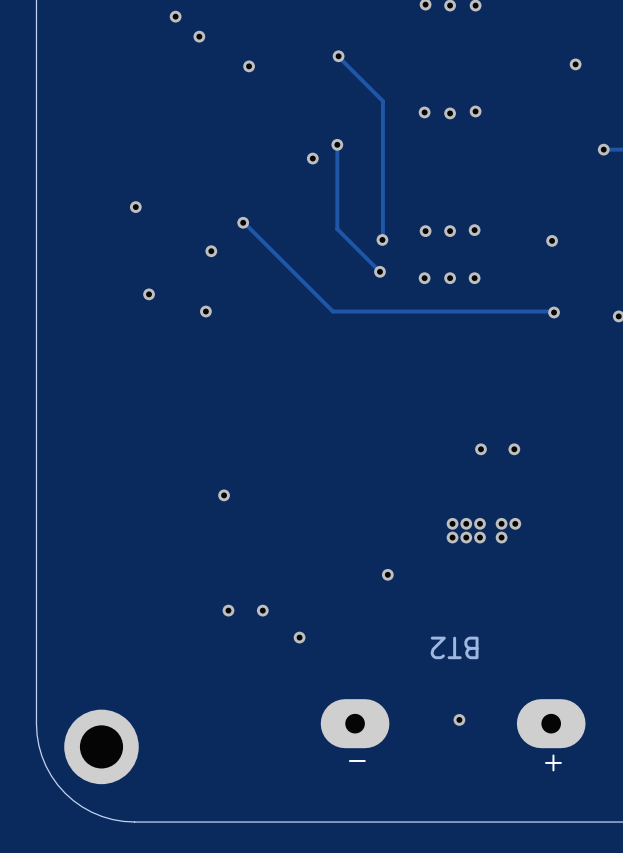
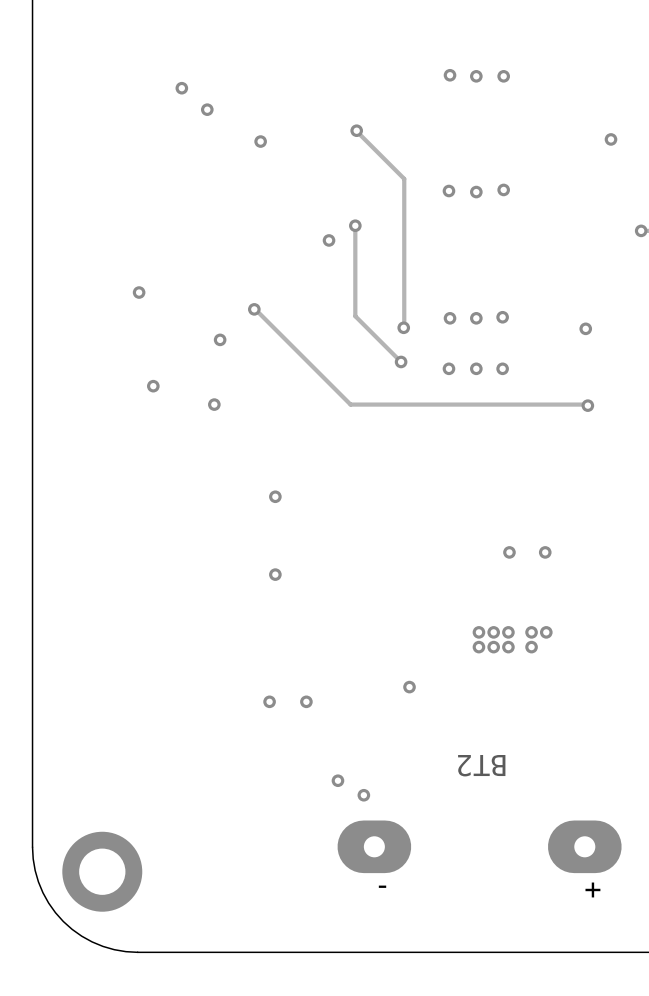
via: none -> (275, 496)
via position: (224, 495) -> (275, 574)
via: none -> (269, 701)
via: none -> (306, 701)
via: (228, 610) -> none
via: (262, 610) -> none
via: (299, 637) -> none
via: none -> (337, 780)
via: none -> (363, 795)
via: (459, 719) -> none

